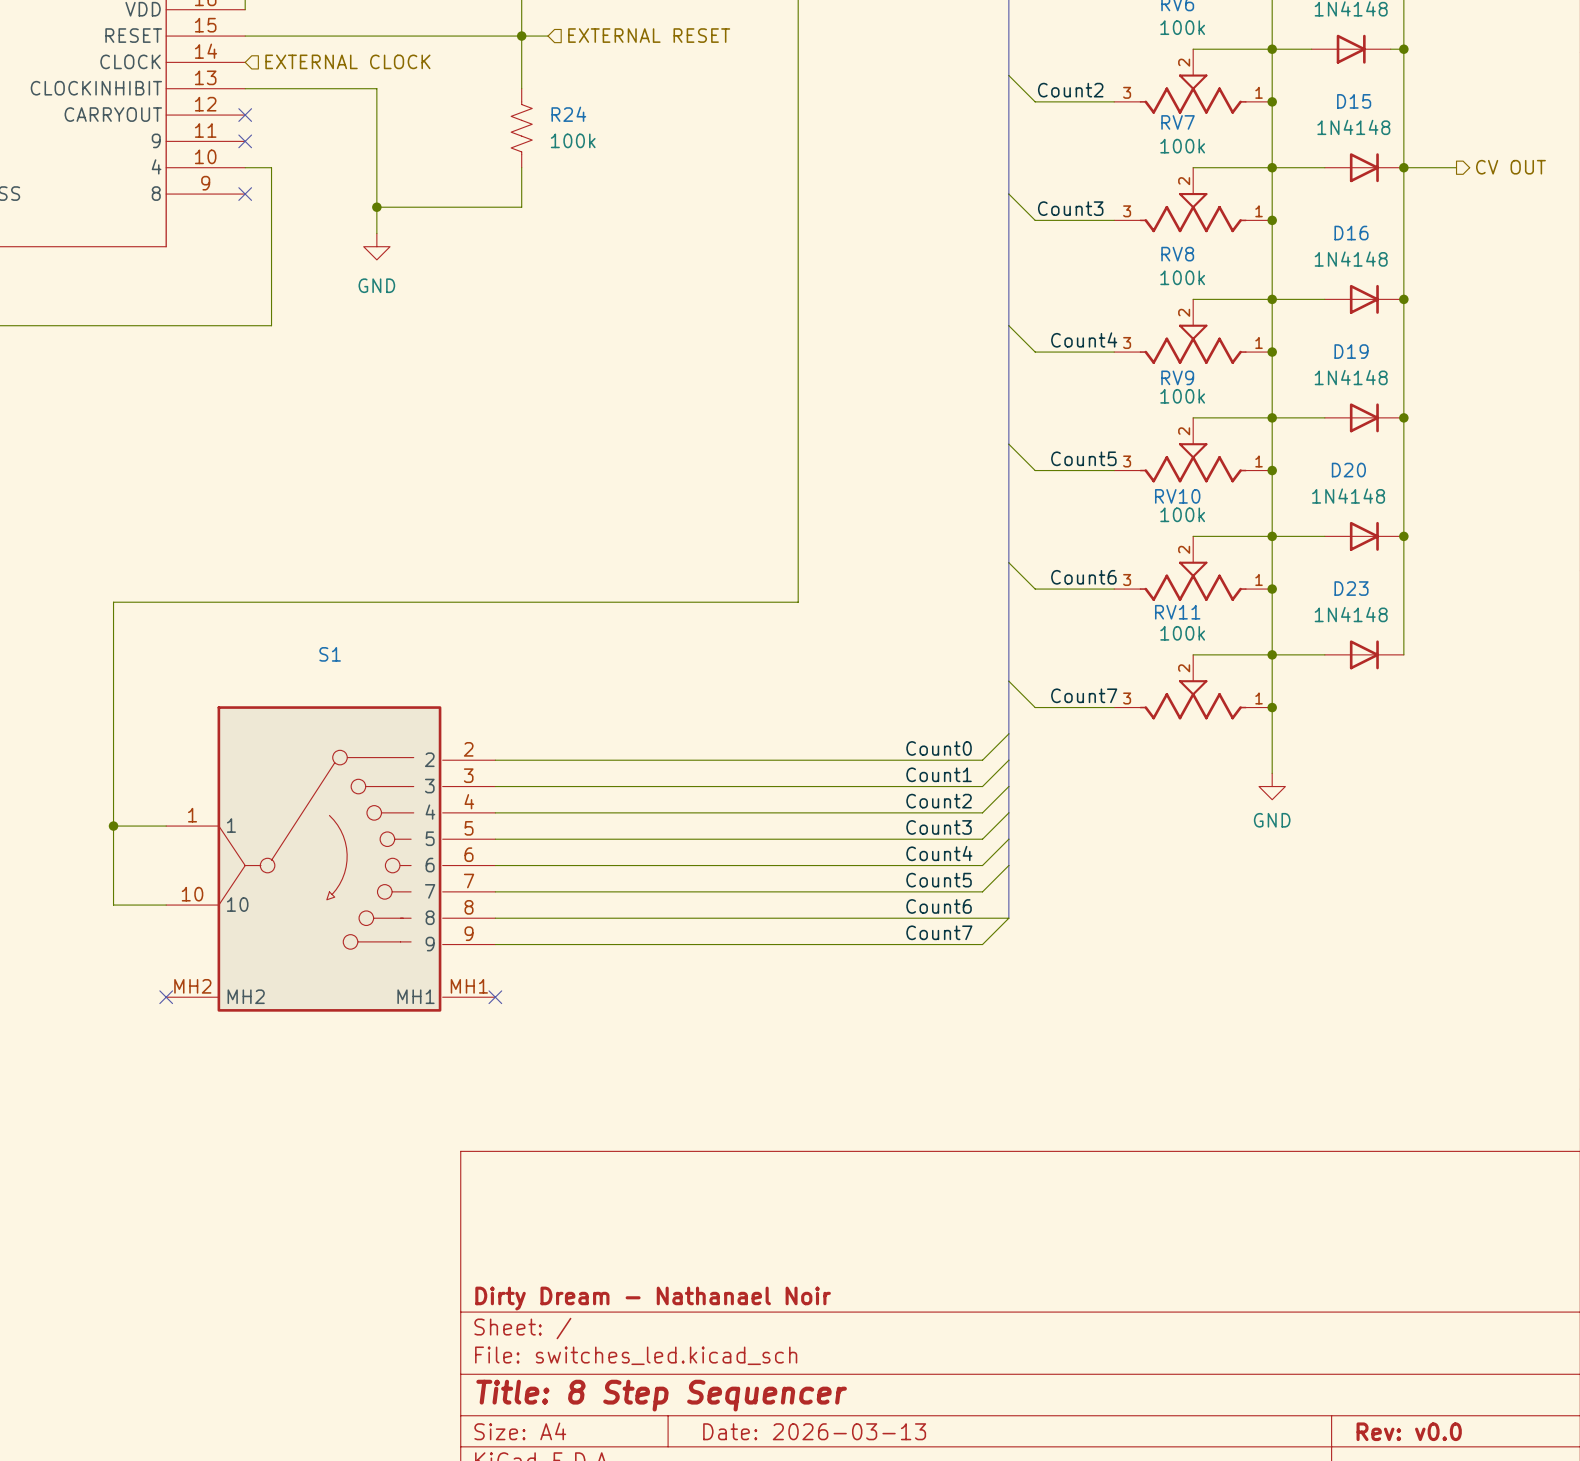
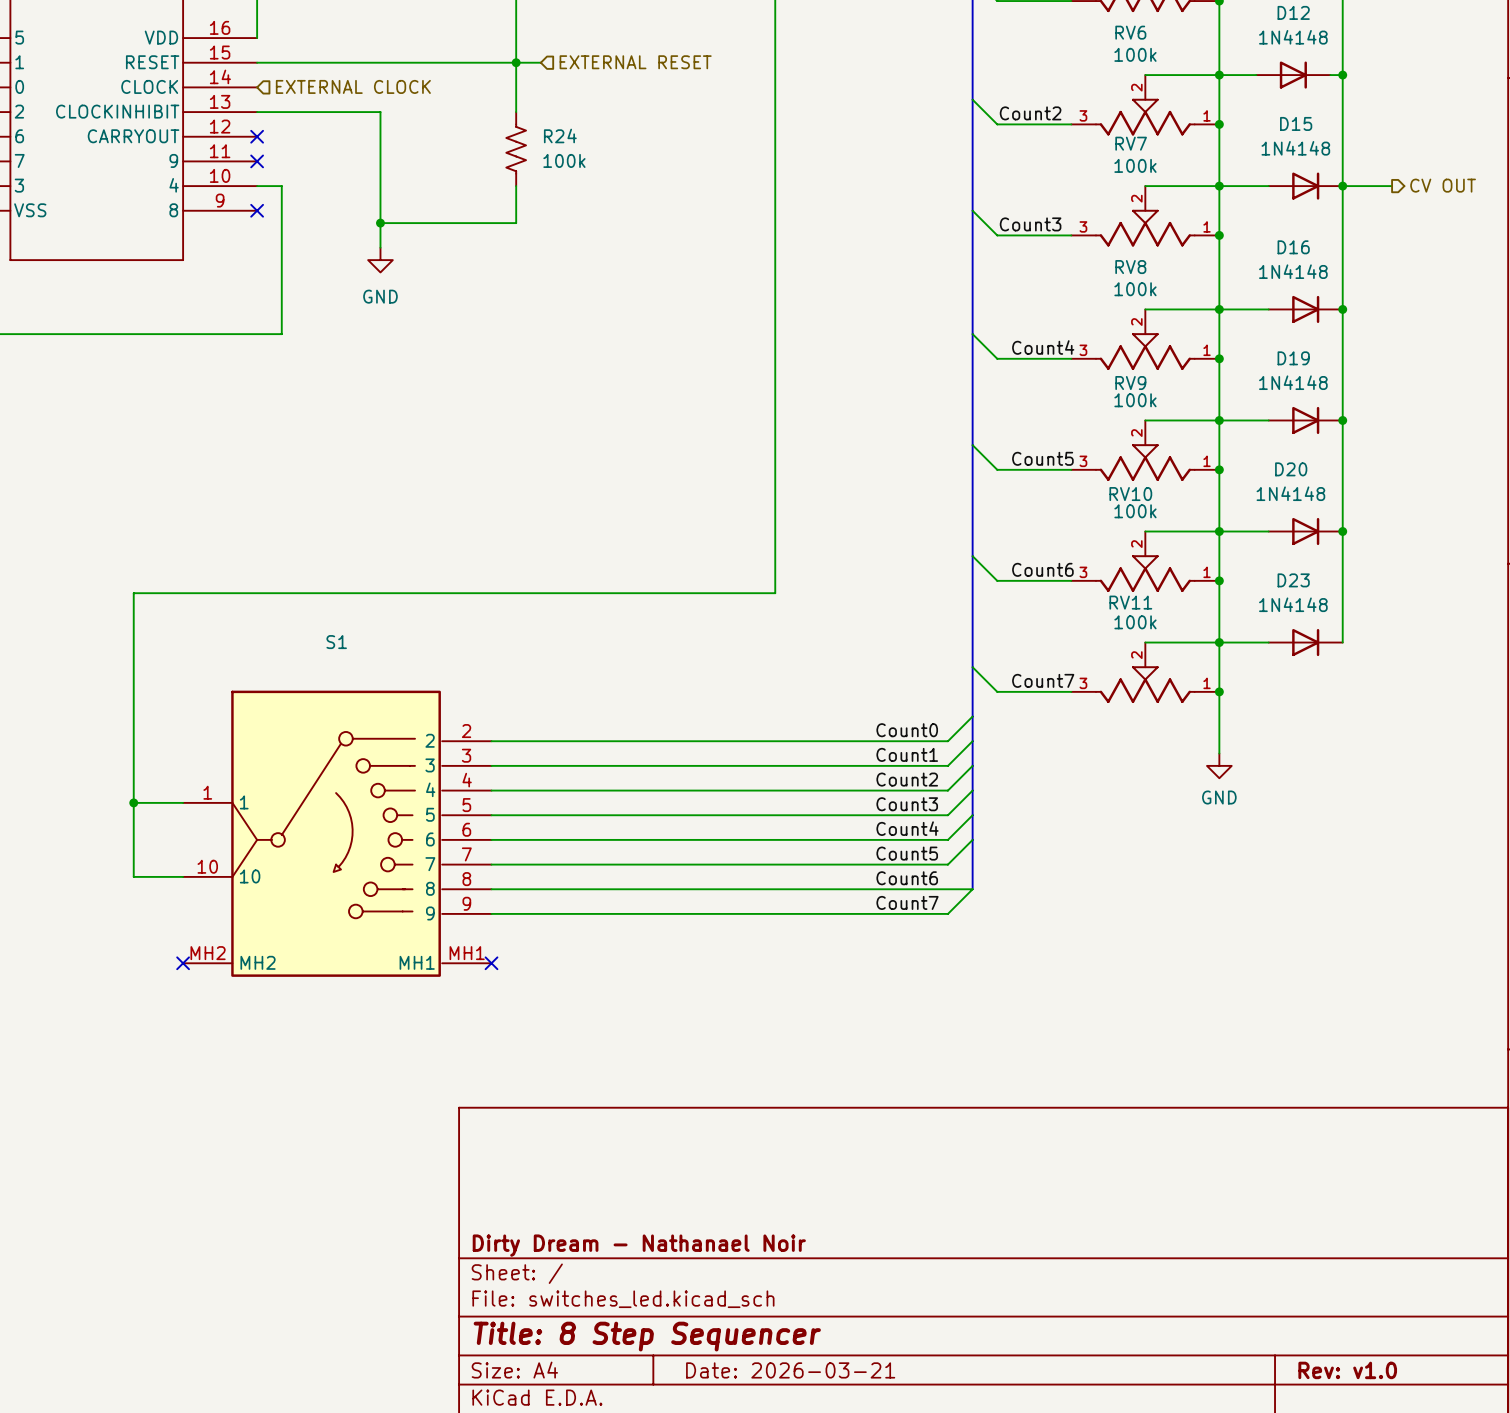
title block: Date: 2026-03-13 (814, 1431) -> Date: 2026-03-21 (790, 1370)
title block: Rev: v0.0 (1409, 1431) -> Rev: v1.0 (1347, 1370)

